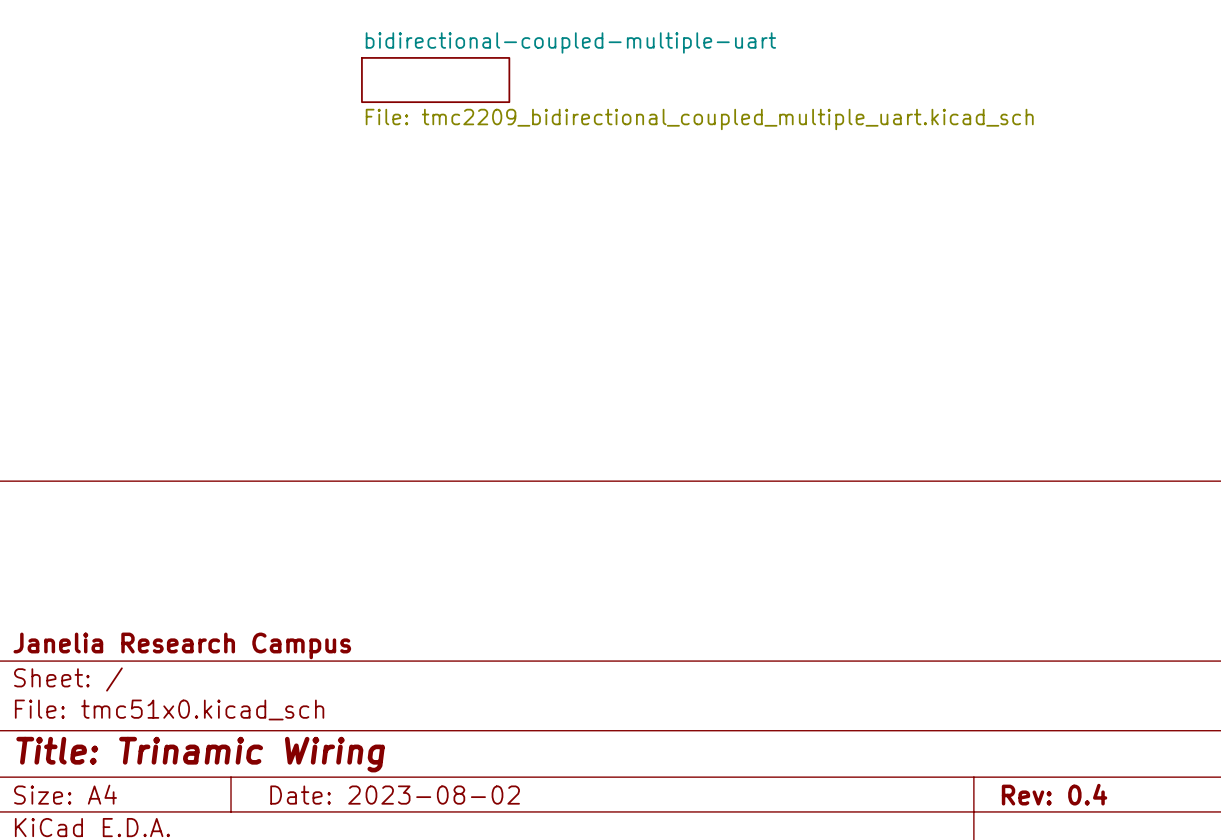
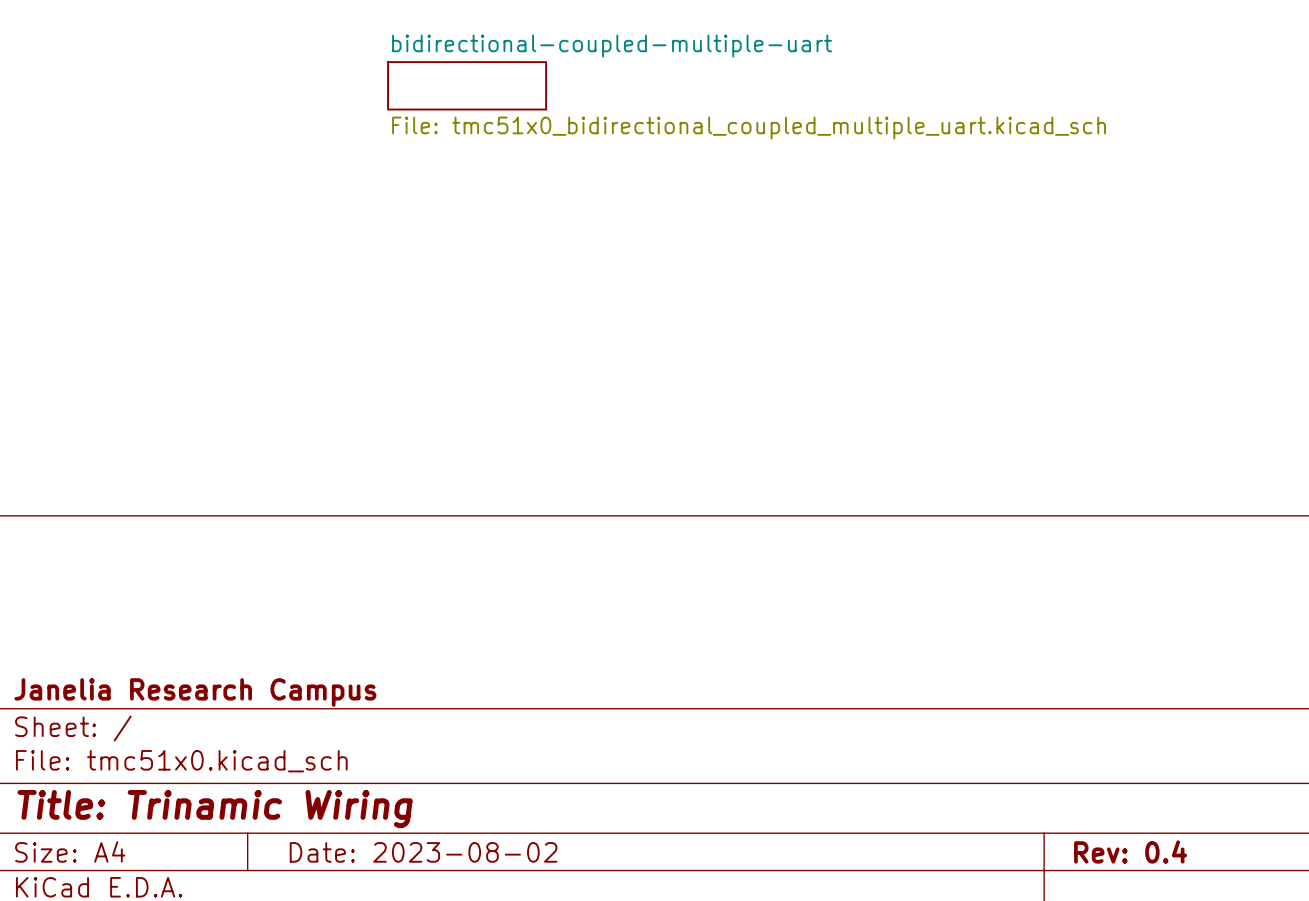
sheet bidirectional-coupled-multiple-uart value: File: tmc2209_bidirectional_coupled_multiple_uart.kicad_sch (699, 119) -> File: tmc51x0_bidirectional_coupled_multiple_uart.kicad_sch (749, 128)

